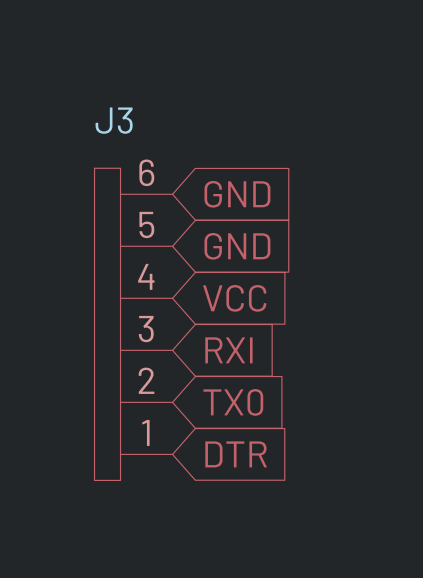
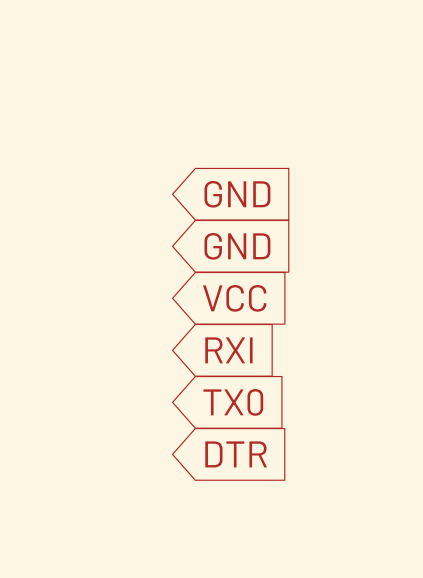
J3: (133, 324) -> none

